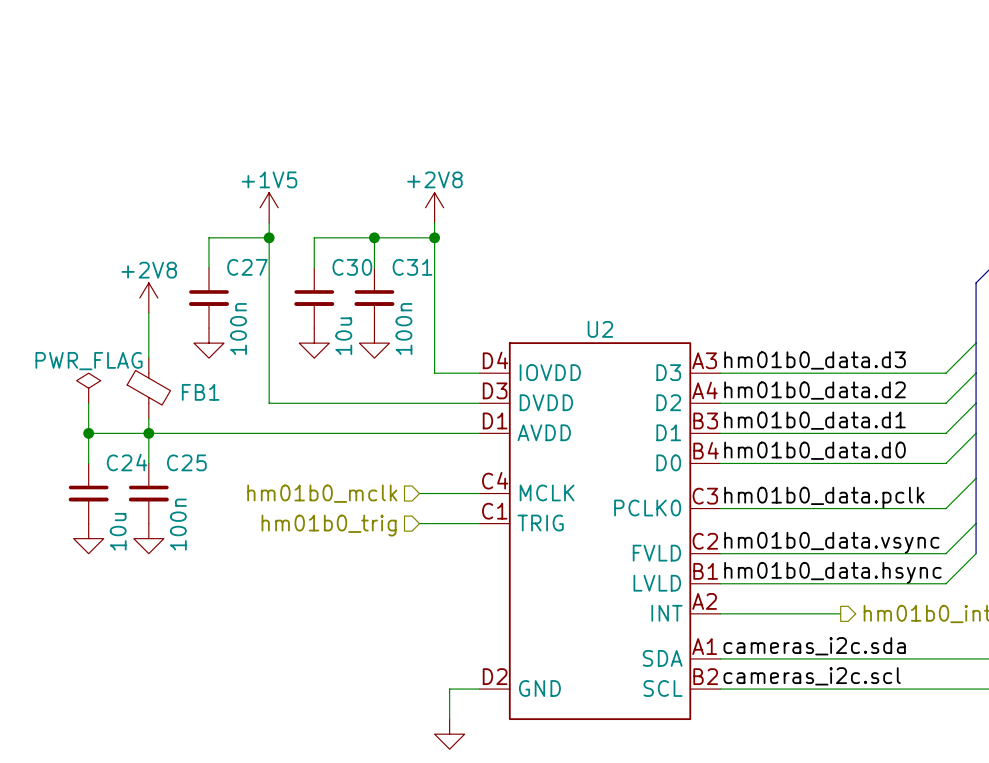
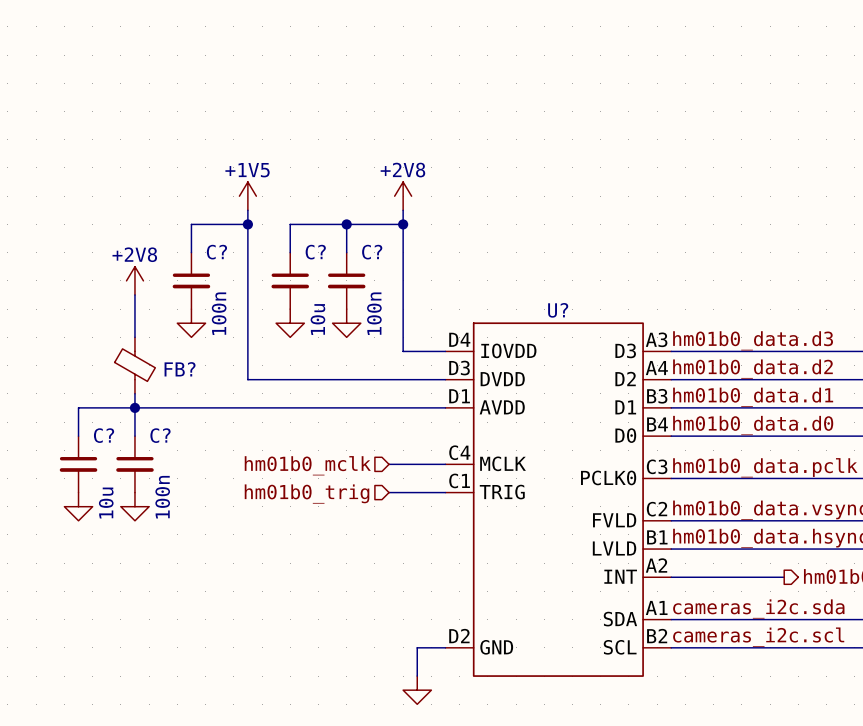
C27 name: C27 (247, 267) -> C? (216, 252)
C30 name: C30 (352, 267) -> C? (315, 252)
C31 name: C31 (412, 267) -> C? (372, 252)
U2 name: U2 (600, 329) -> U? (558, 310)
power symbol: PWR_FLAG (88, 388) -> none
FB1 name: FB1 (200, 392) -> FB? (180, 369)
wire: (88, 403) (88, 433) -> none
junction: (88, 433) -> none
C24 name: C24 (127, 462) -> C? (104, 435)
C25 name: C25 (186, 462) -> C? (160, 435)

